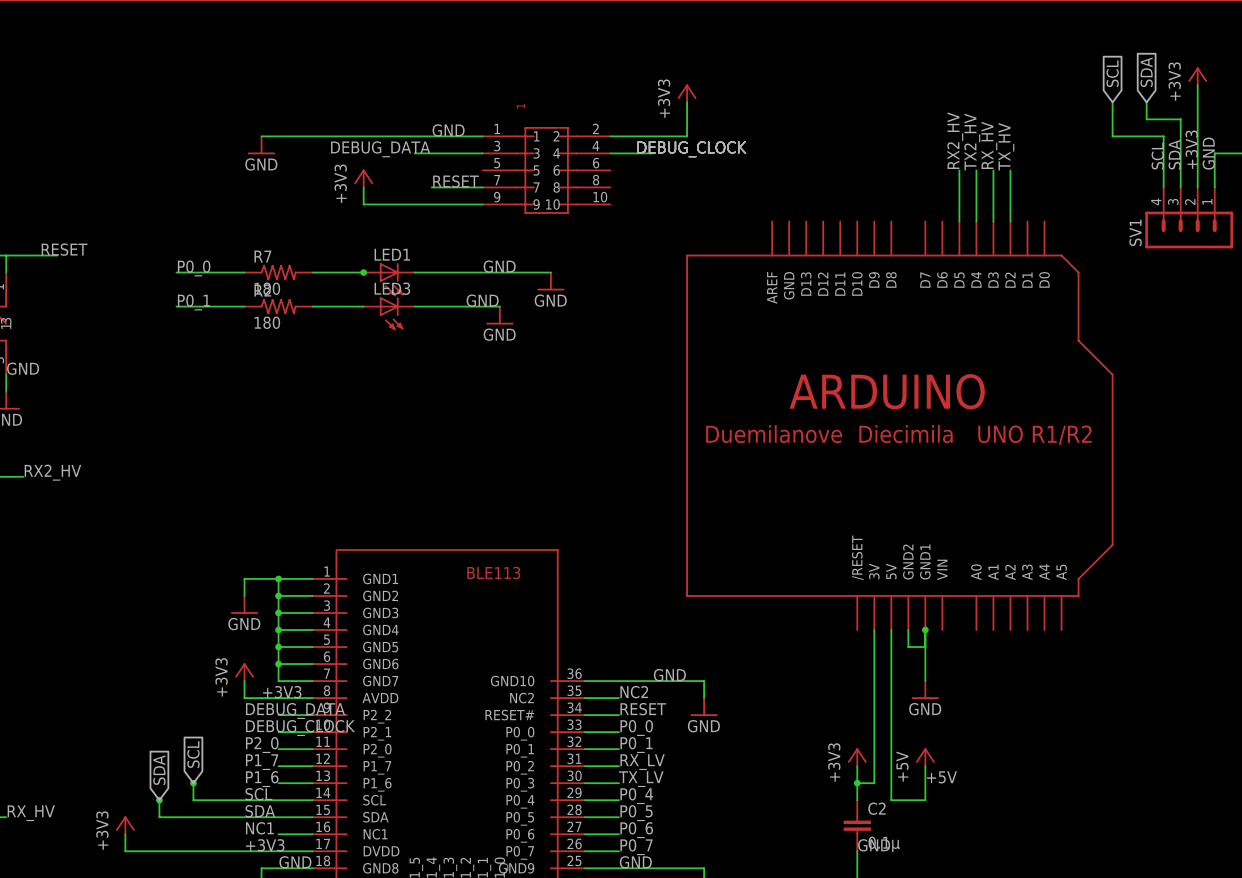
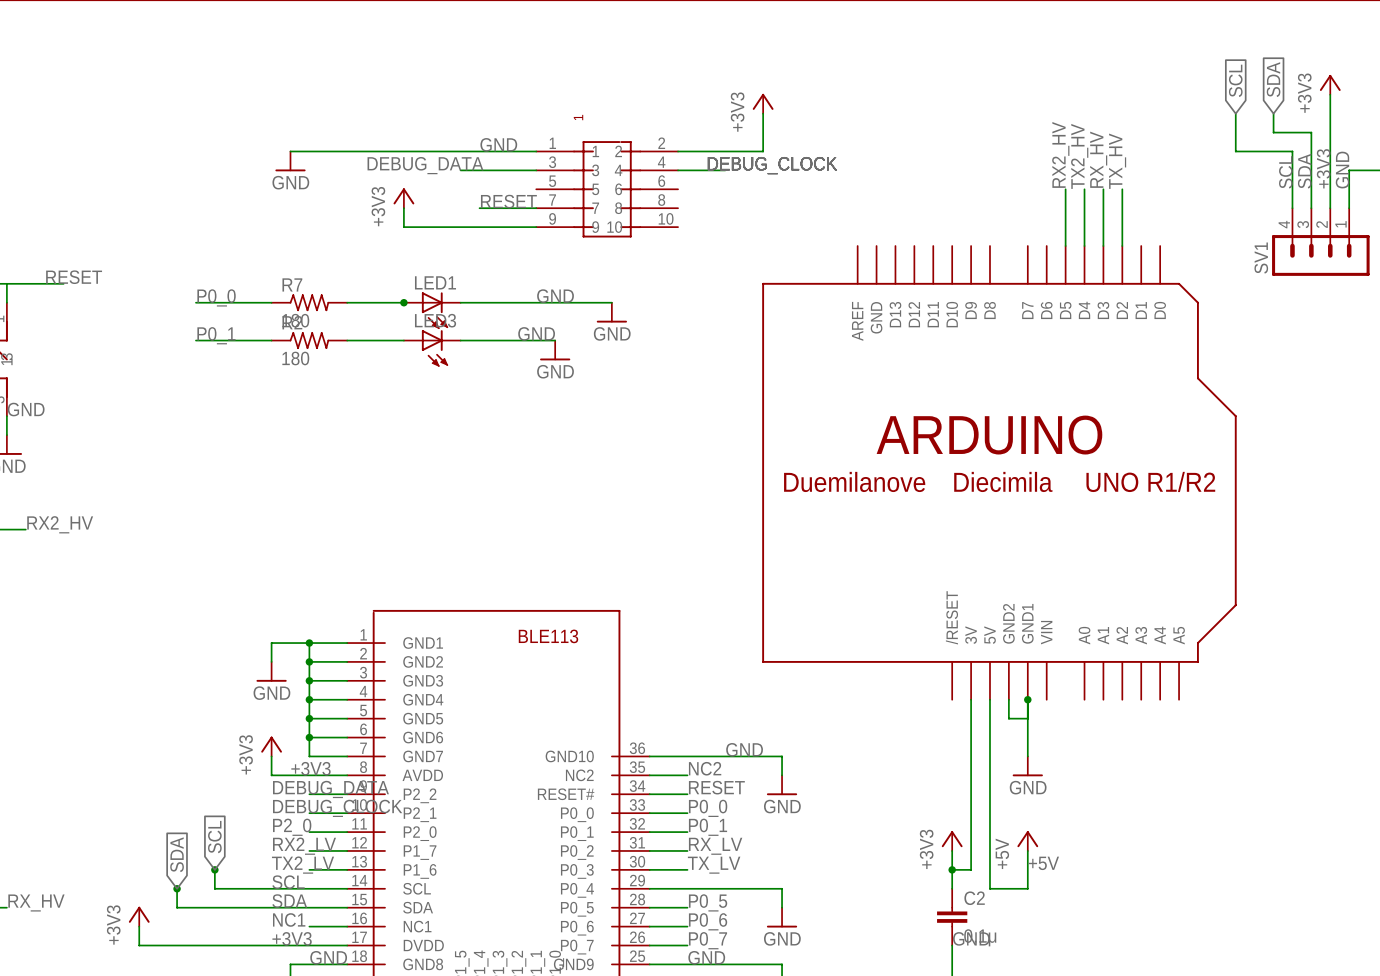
label: P1_7 (262, 762) -> RX2_LV (304, 846)
label: P1_6 (262, 779) -> TX2_LV (303, 865)
label: P0_4 (636, 796) -> none
wire: none -> (687, 888) (782, 888) (782, 907)
power symbol: none -> GND (782, 917)

